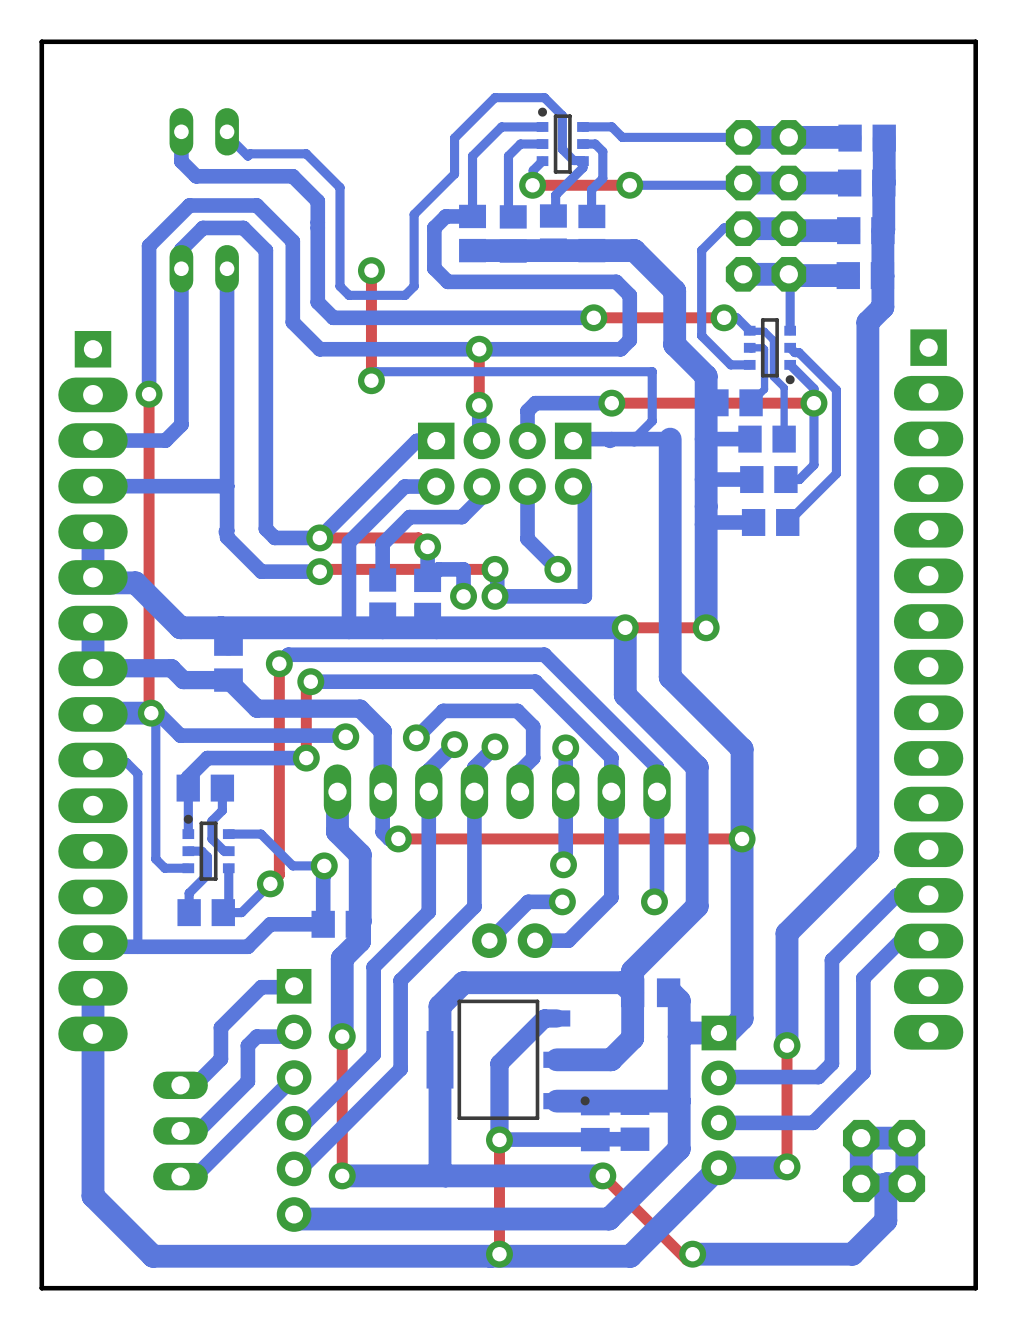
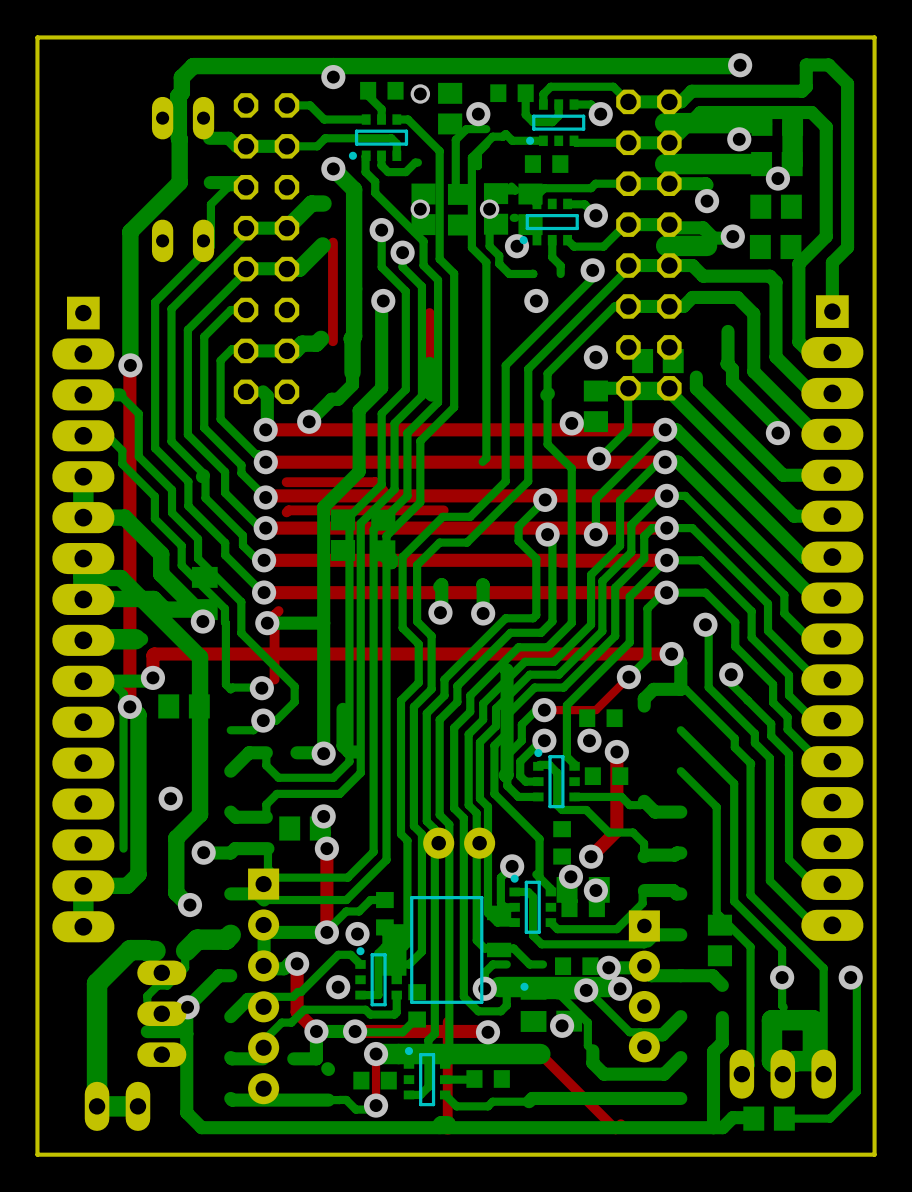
via: none -> (740, 65)
bottom track: none -> (740, 66) (193, 66) (181, 77) (181, 92) (178, 96) (179, 182) (130, 231) (130, 365)
via: none -> (333, 77)
bottom track: none -> (368, 90) (368, 95) (381, 109) (381, 119)
part: none -> (381, 90)
part: none -> (511, 93)
bottom track: none -> (525, 93) (525, 114) (533, 122) (552, 122) (558, 115) (558, 104)
via: none -> (420, 93)
bottom track: none -> (543, 104) (543, 94) (550, 86) (613, 86) (628, 101) (681, 101) (691, 91) (802, 91) (806, 87) (806, 64) (828, 64) (847, 83) (847, 247) (832, 262) (832, 311)
bottom track: none -> (574, 104) (591, 104) (600, 114)
bottom track: none -> (287, 105) (310, 105) (324, 119) (366, 119)
part: none -> (450, 108)
bottom track: (542, 126) (501, 126) (472, 156) (472, 216) (445, 216) (434, 227) (434, 268) (447, 281) (616, 281) (629, 295) (629, 340) (620, 349) (319, 349) (292, 322) (292, 241) (256, 205) (189, 205) (149, 245) (149, 394) -> none
bottom track: (583, 126) (611, 126) (622, 137) (743, 137) -> none
via: none -> (478, 114)
via: none -> (600, 114)
bottom track: (181, 131) (181, 161) (196, 176) (292, 176) (317, 201) (317, 302) (333, 317) (593, 317) -> none
bottom track: (227, 131) (225, 130) (225, 133) (247, 156) (250, 153) (306, 153) (340, 187) (340, 286) (348, 295) (405, 295) (414, 286) (414, 214) (454, 174) (454, 138) (494, 97) (544, 97) (562, 115) (562, 149) (573, 160) (582, 160) (582, 167) (555, 195) (555, 213) (553, 216) -> none
bottom track: none -> (396, 119) (408, 119) (439, 151) (439, 259) (454, 273) (454, 407) (420, 441) (420, 502) (386, 536) (386, 859) (346, 900) (264, 900) (257, 893) (230, 893)
part rotation: 0° (562, 140) -> 90° counterclockwise (555, 122)
part position: (562, 140) -> (555, 122)
bottom track: (582, 144) (595, 144) (602, 151) (602, 178) (591, 189) (591, 216) -> none
part: none -> (378, 137)
bottom track: none -> (209, 138) (228, 138) (236, 146) (317, 146) (325, 138) (391, 138) (396, 143) (396, 155)
via: none -> (739, 139)
bottom track: none -> (543, 140) (512, 140) (505, 134) (503, 136) (492, 136) (471, 157) (471, 247) (486, 262) (486, 458) (482, 461)
bottom track: none -> (574, 140) (576, 142) (670, 142) (700, 112) (811, 112) (826, 127) (826, 236) (798, 263) (798, 342) (809, 352) (832, 352)
bottom track: none -> (366, 155) (365, 172) (375, 181) (375, 193) (423, 241) (423, 265) (438, 280) (438, 402) (407, 433) (407, 495) (373, 529) (373, 851) (347, 877) (276, 877) (267, 868) (267, 848) (235, 848) (230, 852) (203, 852)
bottom track: none -> (381, 155) (381, 165) (388, 172) (405, 172) (415, 162) (417, 162)
bottom track: (881, 181) (883, 183) (882, 307) (867, 322) (867, 483) -> none
part: none -> (546, 164)
bottom track: (743, 183) (739, 185) (629, 185) -> none
via: (532, 185) -> none
top track: (629, 185) (532, 185) -> none
via: (629, 185) -> none
bottom track: none -> (333, 168) (354, 189) (352, 384) (338, 399) (331, 399) (309, 421)
via: none -> (333, 168)
via: none -> (777, 178)
bottom track: none -> (210, 182) (241, 182) (246, 187) (228, 187) (210, 204) (210, 246) (155, 302) (155, 448) (188, 481) (188, 506) (225, 542) (225, 555) (262, 592) (264, 592) (264, 588)
part: (765, 205) -> none
bottom track: none -> (707, 185) (595, 183) (591, 188) (544, 188) (536, 196) (536, 203)
bottom track: none -> (511, 186) (515, 190) (495, 190) (489, 196) (489, 246) (499, 255) (499, 263) (509, 273) (532, 273)
via: none -> (707, 201)
bottom track: none -> (323, 203) (311, 203) (286, 228) (246, 228) (246, 234) (171, 308) (171, 441) (205, 475) (205, 498) (242, 535) (242, 545) (257, 560) (264, 560)
bottom track: none -> (567, 203) (584, 204) (595, 215)
bottom track: (848, 230) (724, 227) (701, 250) (701, 335) (730, 364) (749, 364) -> none
via: none -> (420, 209)
via: none -> (489, 209)
via: none -> (595, 215)
bottom track: none -> (515, 217) (513, 217)
part: none -> (549, 222)
bottom track: (472, 250) (634, 250) (674, 290) (674, 344) (706, 376) (706, 627) -> none
bottom track: none -> (381, 230) (381, 267) (405, 291) (405, 389) (381, 413) (381, 484) (349, 516) (349, 761) (333, 777) (278, 777) (266, 765) (266, 752) (249, 752) (230, 771)
via: none -> (381, 230)
via: none -> (732, 236)
bottom track: none -> (731, 238) (713, 238) (703, 227) (672, 227) (669, 224) (625, 224) (603, 246) (574, 246) (567, 240)
bottom track: none -> (552, 240) (552, 257) (560, 265) (560, 273)
bottom track: (227, 268) (227, 537) (261, 571) (319, 571) -> none
via: (371, 270) -> none
bottom track: none -> (322, 245) (299, 268) (245, 268) (246, 271) (187, 329) (187, 434) (225, 471) (225, 492) (260, 528) (265, 528)
part: none -> (648, 245)
via: none -> (516, 246)
bottom track: (847, 274) (848, 275) (788, 274) (790, 330) -> none
part: none -> (266, 248)
bottom track: none -> (402, 252) (402, 267) (421, 286) (421, 396) (394, 423) (394, 489) (360, 523) (360, 772) (339, 793) (276, 793) (266, 804) (266, 817) (235, 817) (230, 812)
via: none -> (402, 252)
bottom track: none -> (592, 270) (592, 278) (505, 365) (505, 481) (470, 516) (442, 516) (402, 557) (402, 627) (418, 644) (418, 682) (401, 700) (401, 834) (407, 840) (407, 943) (404, 946) (384, 946) (378, 953) (378, 995) (360, 995)
via: none -> (592, 270)
via position: (593, 317) -> (536, 300)
bottom track: (724, 317) (736, 317) (750, 331) (764, 331) (773, 340) (773, 376) (784, 387) (784, 439) -> none
top track: (724, 317) (593, 317) -> none
via: (724, 317) -> none
bottom track: none -> (383, 300) (381, 302) (381, 387) (359, 410) (359, 471) (323, 507) (323, 752) (296, 752)
via: none -> (383, 300)
bottom track: none -> (622, 306) (683, 306) (692, 297) (737, 297) (753, 313) (753, 371) (817, 434) (820, 434)
bottom track: none -> (632, 306) (614, 306) (547, 373) (547, 444) (571, 468) (571, 623) (547, 647) (518, 647) (470, 695) (470, 711) (454, 727) (454, 808) (463, 818) (463, 996) (478, 1011) (500, 1011) (506, 1005) (506, 995)
bottom track: none -> (245, 309) (230, 309) (204, 336) (204, 427) (241, 465) (241, 473) (265, 497) (265, 495)
bottom track: (790, 347) (794, 352) (799, 352) (836, 390) (836, 473) (787, 522) -> none
via: (479, 349) -> none
bottom track: (751, 349) (749, 347) (764, 349) (764, 389) (751, 402) -> none
part: (769, 351) -> none
bottom track: (790, 364) (813, 388) (813, 464) (799, 479) (785, 479) -> none
bottom track: none -> (321, 338) (316, 343) (302, 343) (295, 350) (231, 349) (220, 360) (220, 419) (265, 462)
bottom track: (371, 380) (371, 376) (375, 371) (652, 371) (652, 421) (634, 439) -> none
via: (371, 380) -> none
top track: (149, 394) (149, 710) (151, 713) -> none
via position: (149, 394) -> (130, 365)
via: none -> (595, 357)
bottom track: (611, 403) (535, 403) (527, 411) (527, 440) (526, 439) -> none
via: (611, 403) -> none
top track: (813, 403) (611, 403) -> none
via: (813, 403) -> none
via: (479, 405) -> none
top track: none -> (130, 365) (129, 706)
bottom track: none -> (696, 377) (696, 388) (783, 475) (832, 475)
bottom track: none -> (628, 388) (628, 429) (599, 458)
bottom track: none -> (595, 391) (598, 388) (669, 388) (669, 391) (794, 516) (832, 516)
bottom track: none -> (263, 391) (267, 396) (267, 428) (265, 429)
bottom track: none -> (832, 393) (812, 393) (775, 357) (775, 282) (769, 276) (703, 276) (692, 265) (628, 265) (628, 268) (528, 368) (528, 481) (467, 542) (439, 542) (417, 565) (417, 621) (431, 636) (431, 689) (413, 706) (413, 826) (421, 834) (421, 951) (409, 964) (396, 964)
part: (767, 439) -> none
bottom track: (133, 440) (165, 440) (181, 424) (181, 249) (202, 227) (243, 227) (265, 250) (265, 528) (274, 537) (319, 537) (416, 440) (436, 440) -> (119, 394) (138, 413) (138, 456) (172, 489) (172, 512) (198, 538) (198, 558) (241, 602) (241, 633) (294, 686) (294, 702) (276, 720) (263, 720) (253, 730) (230, 730)
bottom track: (573, 440) (574, 439) (670, 439) (670, 677) (742, 749) (742, 1018) (727, 1033) (682, 1033) (679, 1036) -> none
part: none -> (595, 406)
part: (504, 463) -> none
via: none -> (309, 421)
via: none -> (571, 423)
via: none -> (265, 429)
bottom track: (742, 479) (706, 479) -> (665, 429) (595, 499) (595, 534)
top track: none -> (665, 429) (265, 429)
via: none -> (665, 429)
bottom track: none -> (673, 429) (676, 429) (804, 557) (832, 557)
part: (768, 479) -> none
via: none -> (777, 433)
bottom track: (867, 484) (867, 852) (787, 933) (787, 1045) -> (777, 434) (781, 434) (781, 430) (732, 382) (732, 369) (727, 363) (728, 331)
bottom track: (226, 486) (119, 486) -> (261, 688) (232, 687) (230, 689) (225, 684) (224, 608) (181, 565) (181, 545) (154, 518) (154, 496) (122, 464) (122, 450) (107, 435)
bottom track: (436, 486) (404, 486) (348, 542) (348, 627) -> none
bottom track: (481, 486) (481, 497) (461, 517) (409, 517) (382, 544) (382, 579) -> none
bottom track: (527, 486) (527, 539) (557, 569) -> none
bottom track: (573, 486) (584, 486) (584, 596) (494, 596) (497, 594) (497, 571) (494, 569) -> none
via: none -> (599, 458)
via: none -> (265, 462)
bottom track: none -> (665, 462) (678, 462) (814, 598) (832, 598)
bottom track: none -> (665, 462) (658, 462) (620, 500) (620, 545) (591, 574) (591, 624) (554, 661) (525, 661) (483, 703) (483, 719) (468, 734) (468, 805) (476, 813) (476, 940) (484, 948) (513, 948) (529, 964) (543, 964)
top track: none -> (665, 462) (265, 462)
via: none -> (665, 462)
bottom track: (753, 522) (708, 522) (706, 524) -> none
part: (770, 522) -> none
via: (319, 537) -> none
bottom track: (427, 546) (427, 580) (438, 569) (463, 569) (463, 596) -> none
via: (427, 546) -> none
top track: none -> (666, 495) (267, 495) (265, 497)
via: none -> (666, 495)
via: none -> (265, 497)
bottom track: none -> (545, 499) (518, 526) (518, 540) (536, 558) (536, 615) (533, 618) (505, 618) (444, 679) (444, 695) (426, 713) (426, 821) (434, 829) (434, 1033) (428, 1040) (428, 1087) (420, 1094) (408, 1094)
via: none -> (545, 499)
via: (494, 569) -> none
via: (557, 569) -> none
via: (319, 571) -> none
bottom track: none -> (83, 517) (124, 517) (161, 554) (161, 573) (202, 615) (202, 621)
bottom track: (72, 582) (135, 582) (180, 627) (625, 627) (625, 695) (697, 767) (697, 906) (632, 970) (632, 1038) (611, 1059) (556, 1059) -> none
via: none -> (265, 528)
top track: none -> (666, 528) (265, 528)
via: none -> (666, 528)
via: (463, 596) -> none
via: (494, 596) -> none
bottom track: none -> (547, 534) (552, 539) (552, 621) (541, 632) (510, 632) (457, 685) (457, 702) (439, 719) (439, 814) (449, 824) (449, 1060) (445, 1064)
via: none -> (547, 534)
via: none -> (595, 534)
via: none -> (264, 560)
top track: none -> (666, 560) (264, 560)
via: none -> (666, 560)
via: (625, 627) -> none
via: (706, 627) -> none
bottom track: none -> (83, 574) (86, 578) (120, 578) (200, 657) (200, 814) (176, 838) (176, 892) (189, 905)
bottom track: none -> (482, 584) (483, 613)
bottom track: none -> (439, 586) (441, 584) (440, 612)
via: none -> (264, 592)
top track: none -> (666, 592) (264, 592)
via: none -> (666, 592)
bottom track: none -> (666, 594) (705, 592) (735, 622) (735, 646) (773, 684) (773, 702) (787, 717) (787, 729) (819, 761) (832, 761) (816, 761)
bottom track: none -> (666, 594) (661, 594) (647, 608) (647, 658) (628, 677)
bottom track: (279, 663) (288, 654) (544, 654) (656, 767) (656, 899) (654, 901) -> none
top track: (279, 663) (279, 874) (270, 883) -> none
via: (279, 663) -> none
bottom track: (228, 680) (256, 708) (360, 708) (382, 731) (383, 791) -> none
bottom track: (310, 681) (535, 681) (611, 757) (611, 897) (568, 940) (535, 940) -> none
via: (310, 681) -> none
via: none -> (440, 612)
via: none -> (483, 613)
via: none -> (202, 621)
via: none -> (267, 623)
bottom track: none -> (323, 623) (267, 623)
bottom track: none -> (705, 624) (708, 627) (708, 687) (754, 733) (754, 743) (769, 758) (769, 880) (814, 925) (832, 925)
via: none -> (705, 624)
bottom track: none -> (832, 638) (810, 639) (784, 613) (784, 594) (685, 495) (660, 495) (631, 524) (631, 552) (602, 581) (602, 631) (558, 674) (529, 674) (496, 708) (496, 726) (479, 742) (479, 798) (487, 806) (487, 913) (497, 922) (514, 922)
via: (151, 713) -> none
bottom track: none -> (671, 654) (680, 662) (680, 689)
top track: none -> (671, 654) (154, 654) (152, 677)
via: none -> (671, 654)
bottom track: (345, 736) (180, 735) (158, 713) (155, 715) (155, 859) (164, 868) (188, 868) -> none
via: (345, 736) -> none
bottom track: (416, 737) (443, 710) (517, 710) (533, 726) (533, 758) (520, 771) (520, 791) -> none
via: (416, 737) -> none
bottom track: (454, 744) (428, 770) (428, 911) (373, 966) (373, 1054) (305, 1123) (294, 1123) -> none
via: (454, 744) -> none
bottom track: (494, 746) (474, 767) (474, 906) (400, 980) (400, 1069) (300, 1168) (294, 1168) -> none
via: (494, 746) -> none
via: (565, 747) -> none
bottom track: none -> (731, 674) (731, 683) (771, 723) (771, 736) (789, 754) (789, 859) (813, 884) (832, 884)
via: none -> (731, 674)
top track: none -> (628, 677) (595, 710) (544, 710)
via: none -> (628, 677)
bottom track: none -> (152, 677) (149, 681) (109, 681)
via: none -> (152, 677)
bottom track: (306, 758) (207, 758) (188, 777) (188, 788) -> none
via position: (306, 758) -> (261, 688)
bottom track: none -> (831, 680) (816, 679) (768, 630) (768, 603) (692, 528) (652, 528) (644, 536) (644, 558) (615, 587) (615, 636) (563, 687) (534, 687) (508, 713) (508, 731) (494, 745) (494, 793) (539, 838) (539, 877)
bottom track: none -> (680, 689) (685, 689) (734, 738) (734, 747) (751, 763)
bottom track: none -> (680, 689) (653, 689) (644, 698) (644, 706)
bottom track: none -> (129, 706) (138, 714) (138, 874) (127, 885) (83, 885)
via: none -> (129, 706)
bottom track: (188, 788) (188, 834) -> none
bottom track: (225, 791) (222, 788) (222, 810) (211, 820) (211, 838) (224, 851) (228, 851) -> none
bottom track: (337, 791) (337, 831) (360, 854) (360, 921) (357, 924) (359, 926) (359, 941) (342, 958) (342, 1036) -> none
part: (497, 791) -> none
bottom track: none -> (544, 710) (536, 710) (521, 724) (521, 740) (507, 755) (507, 785) (518, 796) (538, 796)
via: none -> (544, 710)
part: none -> (600, 718)
via: none -> (263, 720)
bottom track: none -> (818, 720) (818, 723) (830, 723) (832, 720) (828, 716) (810, 716) (789, 695) (789, 675) (751, 637) (751, 611) (700, 560) (666, 560) (629, 596) (629, 642) (566, 705) (566, 756) (574, 766)
bottom track: none -> (680, 730) (734, 783) (734, 901) (782, 949) (782, 1005) (783, 1007)
bottom track: none -> (544, 740) (541, 740) (520, 761) (520, 776) (525, 781) (538, 781)
via: none -> (544, 740)
via: none -> (589, 740)
bottom track: (228, 834) (261, 834) (292, 865) (328, 865) -> none
via: (398, 838) -> none
top track: none -> (616, 752) (616, 830) (591, 856)
via: none -> (616, 752)
top track: (742, 838) (398, 838) -> none
via: (742, 838) -> none
via: none -> (323, 753)
part: (208, 847) -> none
bottom track: (188, 851) (201, 851) (207, 856) (207, 874) (189, 893) (189, 912) -> none
bottom track: none -> (750, 763) (750, 895) (823, 968) (823, 1074)
bottom track: none -> (538, 766) (549, 764) (557, 772) (557, 805) (562, 809) (586, 809) (608, 832) (632, 832) (644, 843) (644, 856) (680, 852)
bottom track: none -> (680, 771) (716, 807) (716, 913) (750, 946) (750, 1065) (741, 1074)
via: (563, 864) -> none
bottom track: (324, 865) (323, 924) (270, 924) (247, 946) (97, 946) (92, 942) -> none
via: (324, 865) -> none
part: none -> (606, 776)
bottom track: (228, 868) (228, 907) (223, 912) (241, 912) (270, 883) -> none
part: none -> (556, 778)
via: (270, 883) -> none
bottom track: none -> (574, 796) (621, 796) (629, 805) (640, 805) (644, 801) (655, 812) (680, 812)
via: none -> (170, 798)
bottom track: (928, 895) (896, 895) (831, 960) (831, 1063) (818, 1077) (718, 1077) -> none
bottom track: (562, 901) (528, 901) (489, 940) -> none
via: (562, 901) -> none
via: (654, 901) -> none
via: none -> (323, 816)
part: (206, 912) -> none
part: none -> (562, 842)
bottom track: (928, 941) (900, 941) (863, 978) (863, 1072) (813, 1122) (718, 1122) -> none
top track: none -> (326, 848) (326, 932)
via: none -> (326, 848)
via: none -> (203, 852)
via: none -> (591, 856)
bottom track: none -> (512, 866) (500, 877) (500, 903) (504, 907) (514, 907)
via: none -> (512, 866)
bottom track: none -> (536, 874) (550, 888) (550, 891)
via: none -> (570, 876)
bottom track: (294, 986) (261, 987) (220, 1027) (220, 1059) (194, 1085) (180, 1085) -> none
bottom track: (632, 992) (622, 982) (463, 982) (440, 1006) (440, 1170) (445, 1175) -> none
bottom track: (668, 992) (671, 992) (679, 1000) (679, 1148) (609, 1219) (298, 1219) (294, 1214) -> none
via: none -> (595, 890)
bottom track: none -> (514, 891) (528, 891) (533, 896) (533, 935) (541, 944) (644, 944) (653, 934) (680, 934)
bottom track: none -> (680, 893) (676, 893) (673, 890) (644, 890) (642, 892) (642, 903) (616, 929) (557, 929) (550, 922)
bottom track: none -> (384, 900) (370, 900) (359, 911) (346, 911) (326, 932) (265, 932) (264, 930) (264, 968) (284, 968) (289, 963) (297, 963)
part: none -> (532, 904)
via: none -> (189, 905)
part: none -> (583, 908)
bottom track: (556, 1018) (544, 1018) (499, 1063) (499, 1139) (634, 1139) -> none
part: none -> (384, 913)
bottom track: (293, 1031) (289, 1036) (256, 1036) (247, 1045) (247, 1081) (198, 1130) (180, 1130) -> none
bottom track: (92, 1033) (92, 1196) (153, 1256) (630, 1256) (718, 1167) (787, 1166) -> none
top track: (342, 1036) (342, 1175) -> none
via: (342, 1036) -> none
via: none -> (326, 932)
bottom track: none -> (230, 934) (225, 939) (197, 939) (185, 951) (185, 967) (167, 985) (157, 985) (147, 996) (147, 1001)
via: none -> (357, 934)
top track: (787, 1045) (787, 1166) -> none
via: (787, 1045) -> none
part: none -> (719, 940)
bottom track: none -> (155, 950) (130, 950) (97, 983) (97, 1106) (137, 1106)
top track: none -> (297, 963) (297, 1012) (316, 1031)
via: none -> (297, 963)
bottom track: none -> (360, 964) (350, 954) (338, 954) (301, 992) (297, 992) (293, 996) (247, 999) (230, 1016)
bottom track: none -> (506, 964) (492, 964) (484, 972) (484, 988)
bottom track: (289, 1077) (294, 1077) (195, 1176) (180, 1176) -> none
part: none -> (576, 966)
bottom track: none -> (590, 966) (643, 967) (651, 975) (712, 975) (722, 985)
via: none -> (608, 967)
bottom track: none -> (230, 975) (219, 975) (187, 1007)
part: none -> (378, 976)
via: none -> (782, 977)
bottom track: none -> (850, 977) (856, 983) (856, 1091) (830, 1118) (784, 1118)
via: none -> (850, 977)
via: none -> (338, 987)
via: none -> (484, 988)
via: none -> (620, 988)
bottom track: none -> (586, 990) (629, 1032) (640, 1032) (642, 1034) (662, 1034) (680, 1016)
via: none -> (586, 990)
bottom track: none -> (396, 995) (396, 1012) (394, 1014) (370, 1014) (365, 1009) (304, 1009) (291, 1022) (281, 1022) (263, 1041) (263, 1058) (230, 1057)
bottom track: none -> (543, 995) (560, 995) (587, 1022) (587, 1045) (592, 1050) (592, 1063) (603, 1074) (664, 1074) (680, 1057)
part: none -> (417, 1005)
via: none -> (187, 1007)
bottom track: none -> (187, 1010) (186, 1112) (201, 1127) (722, 1127) (732, 1117) (753, 1118)
bottom track: none -> (722, 1017) (722, 1042) (713, 1051) (713, 1127)
bottom track: none -> (417, 1019) (402, 1032) (316, 1031) (316, 1058) (293, 1058)
via: (499, 1139) -> none
via: none -> (562, 1025)
bottom track: none -> (147, 1031) (184, 1031) (186, 1033)
via: none -> (355, 1031)
top track: none -> (487, 1032) (355, 1031) (352, 1033)
via: none -> (487, 1032)
part: (884, 1160) -> none
via: (787, 1166) -> none
via position: (342, 1175) -> (316, 1031)
bottom track: (419, 1175) (342, 1175) -> none
top track: none -> (376, 1054) (376, 1105)
via: none -> (376, 1054)
via: (602, 1175) -> none
bottom track: (885, 1184) (885, 1220) (852, 1254) (692, 1254) -> none
bottom track: none -> (327, 1068) (328, 1069)
part: none -> (782, 1074)
part: none -> (427, 1076)
bottom track: none -> (474, 1078) (445, 1079)
part: none -> (488, 1078)
part: none -> (375, 1080)
bottom track: none -> (445, 1094) (456, 1106) (487, 1106) (492, 1101) (529, 1101) (532, 1098) (680, 1098)
bottom track: none -> (230, 1098) (232, 1100) (339, 1100)
bottom track: none -> (339, 1099) (346, 1099) (355, 1109) (373, 1109) (376, 1105)
via: none -> (376, 1105)
part: none -> (117, 1106)
part: none -> (769, 1118)
via: (499, 1254) -> none
via: (692, 1254) -> none

